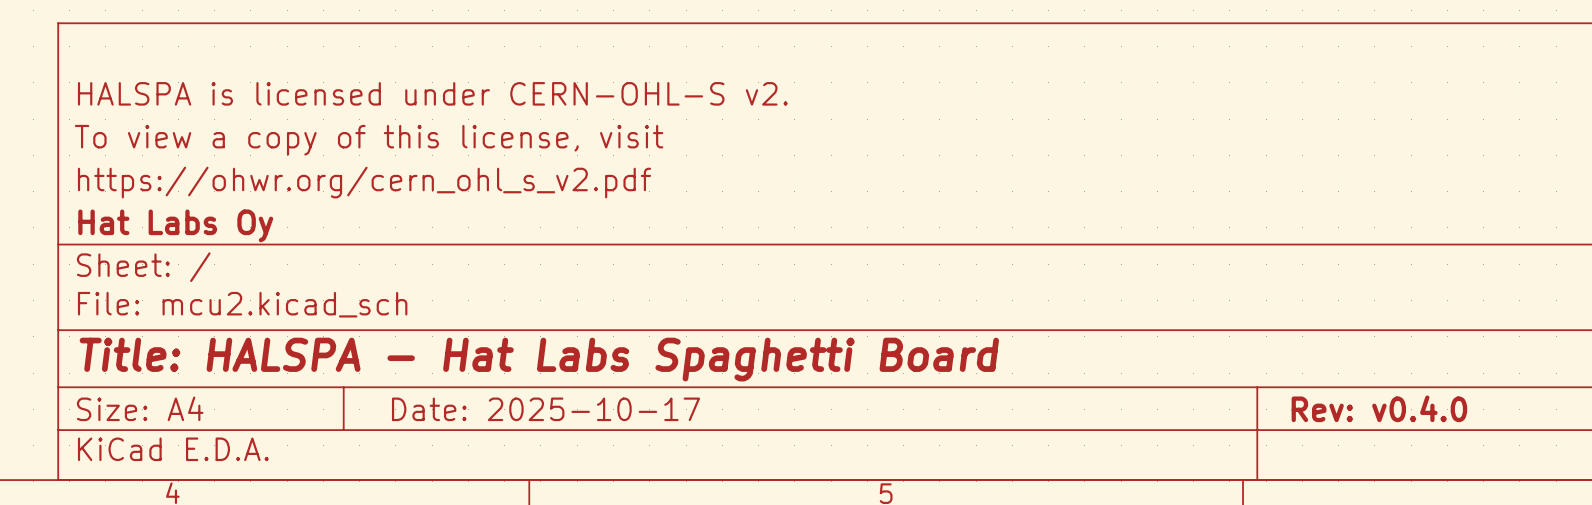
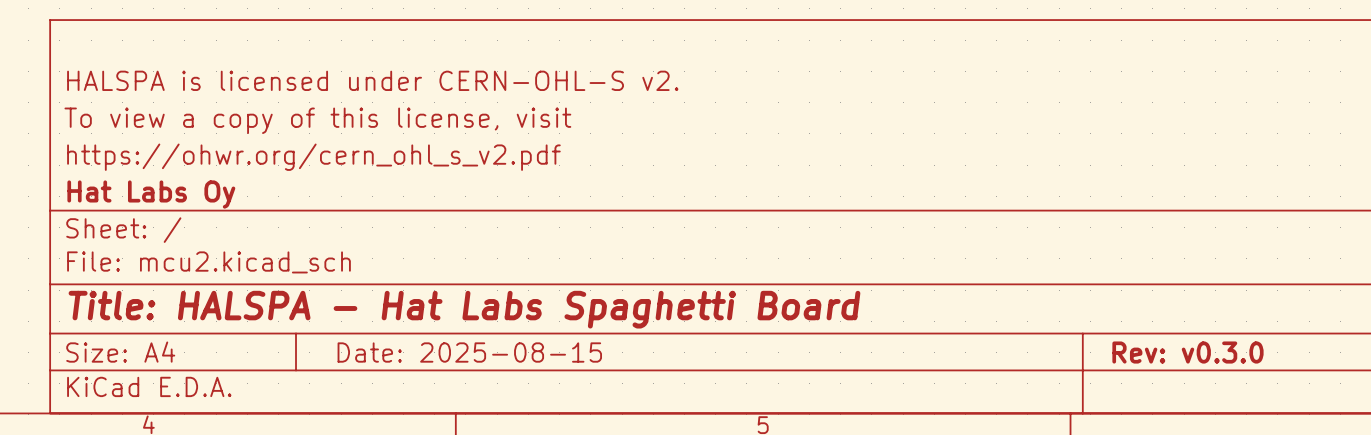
title block: Rev: v0.4.0 (1379, 408) -> Rev: v0.3.0 (1187, 352)
title block: Date: 2025-10-17 (546, 409) -> Date: 2025-08-15 (469, 352)

